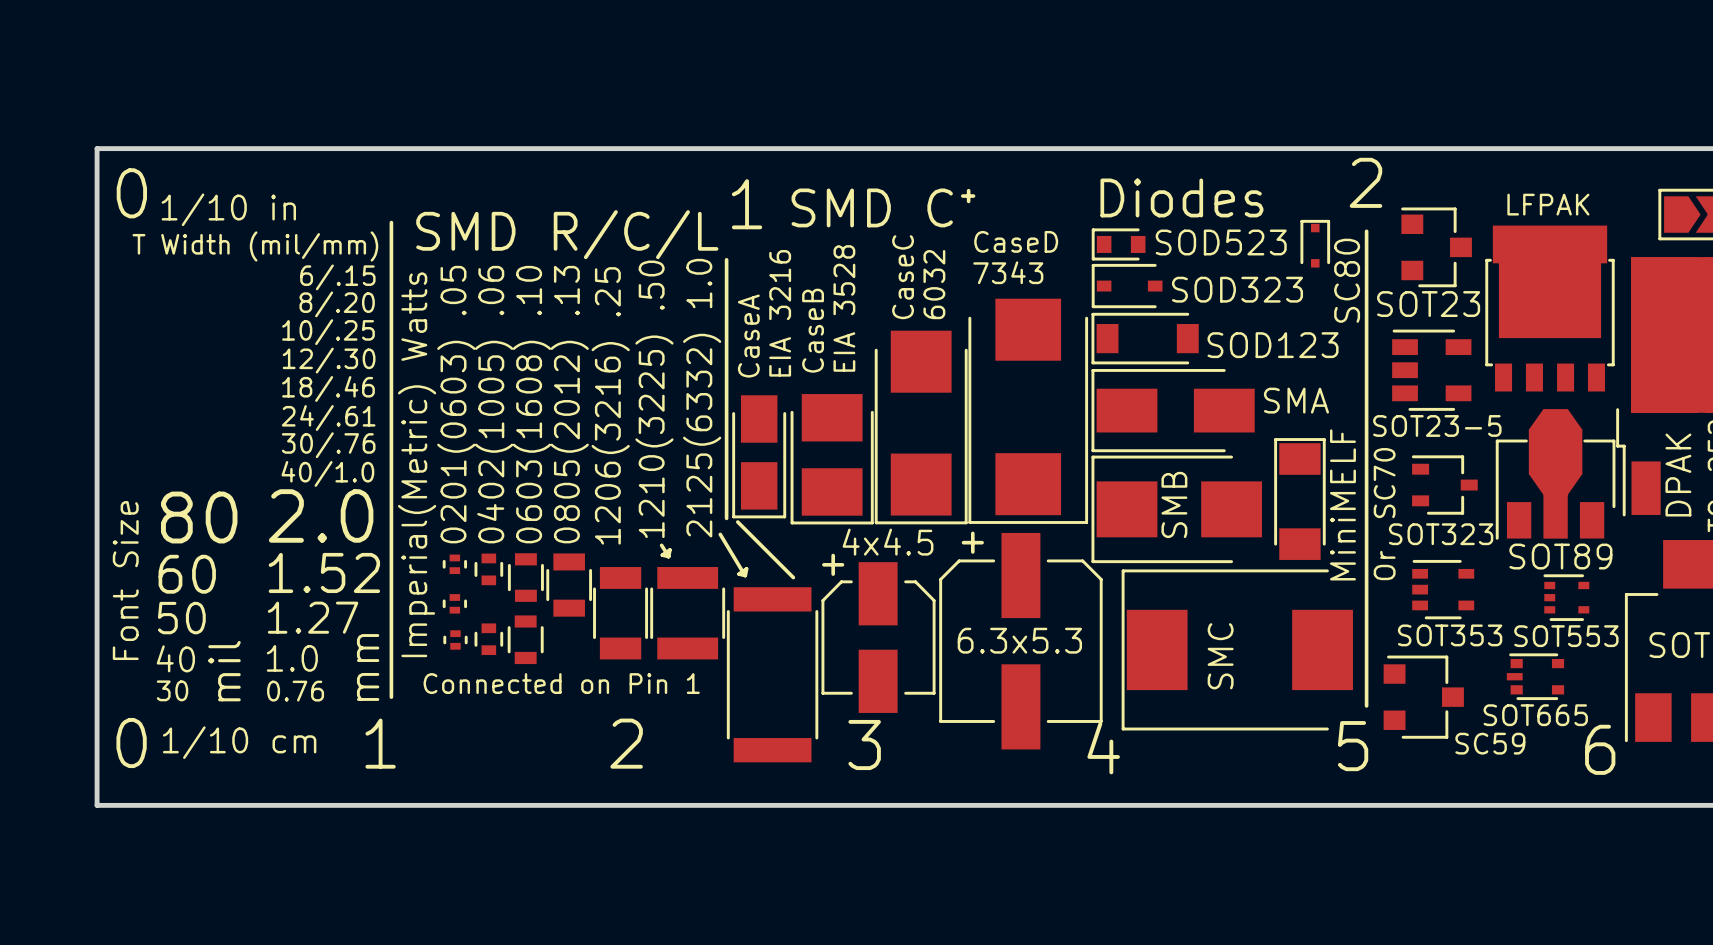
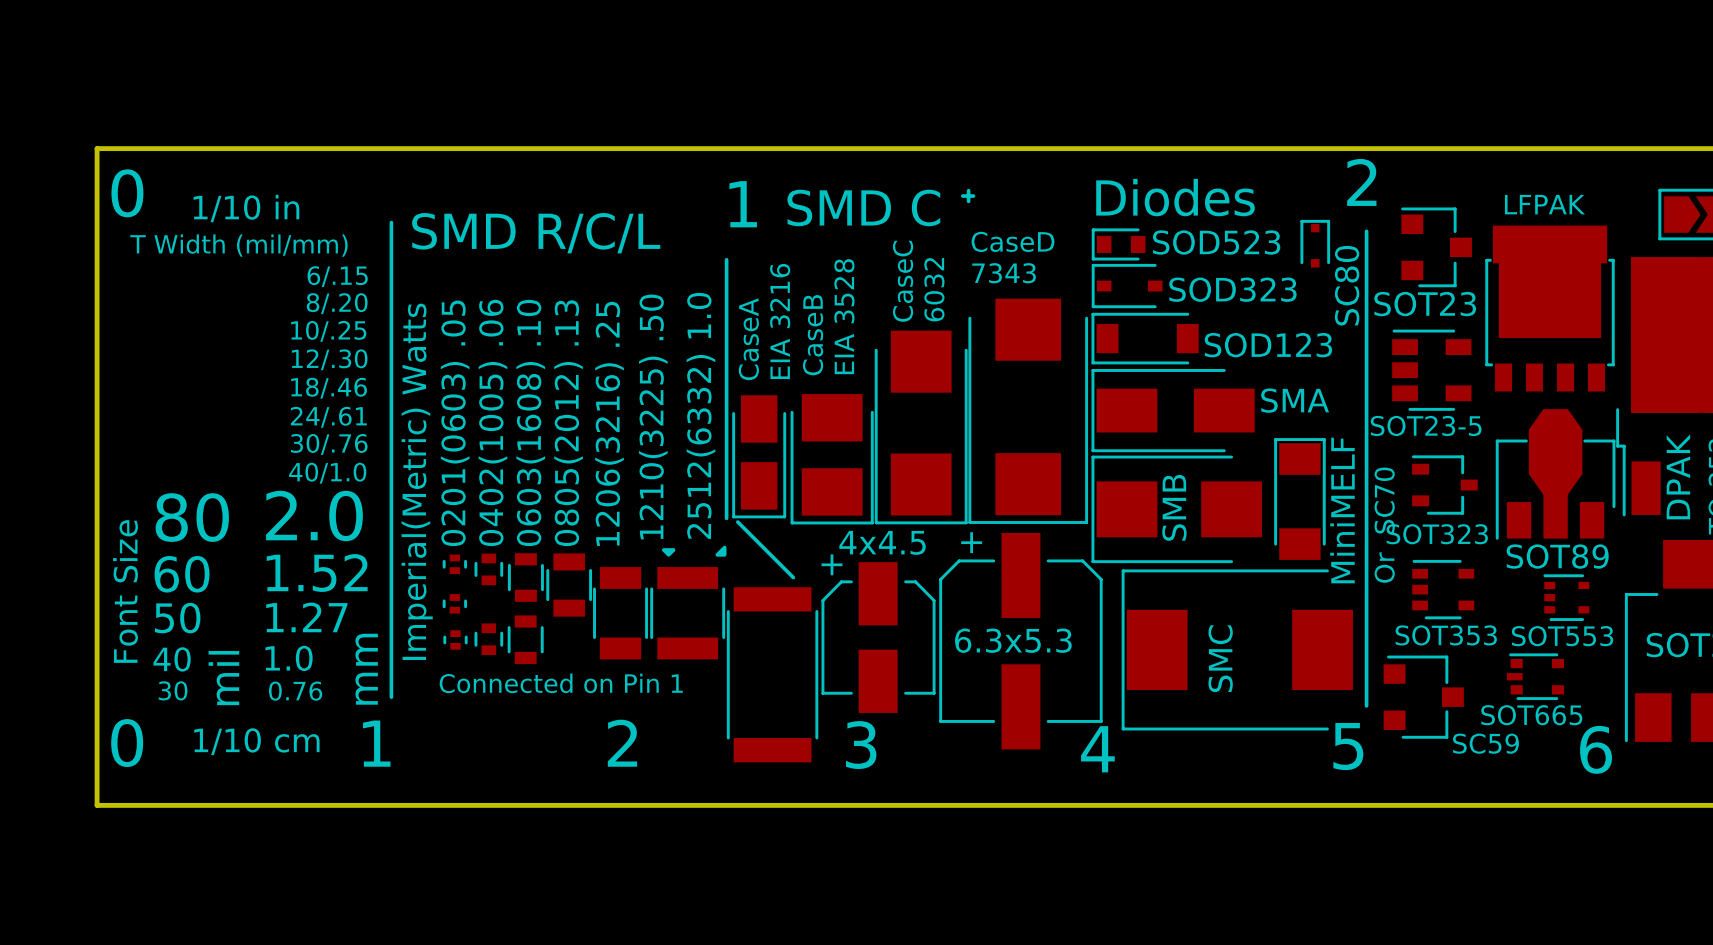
text: 2125(6332) 1.0 (702, 398) -> 2512(6332) 1.0 (700, 415)
line: (720, 534) (744, 574) -> none
line: (661, 545) (668, 556) (669, 549) (662, 555) (667, 556) -> none
drawing: none -> [715, 545, 727, 557]
drawing: none -> [662, 548, 676, 557]
line: (744, 575) (739, 574) (746, 568) (745, 575) -> none

